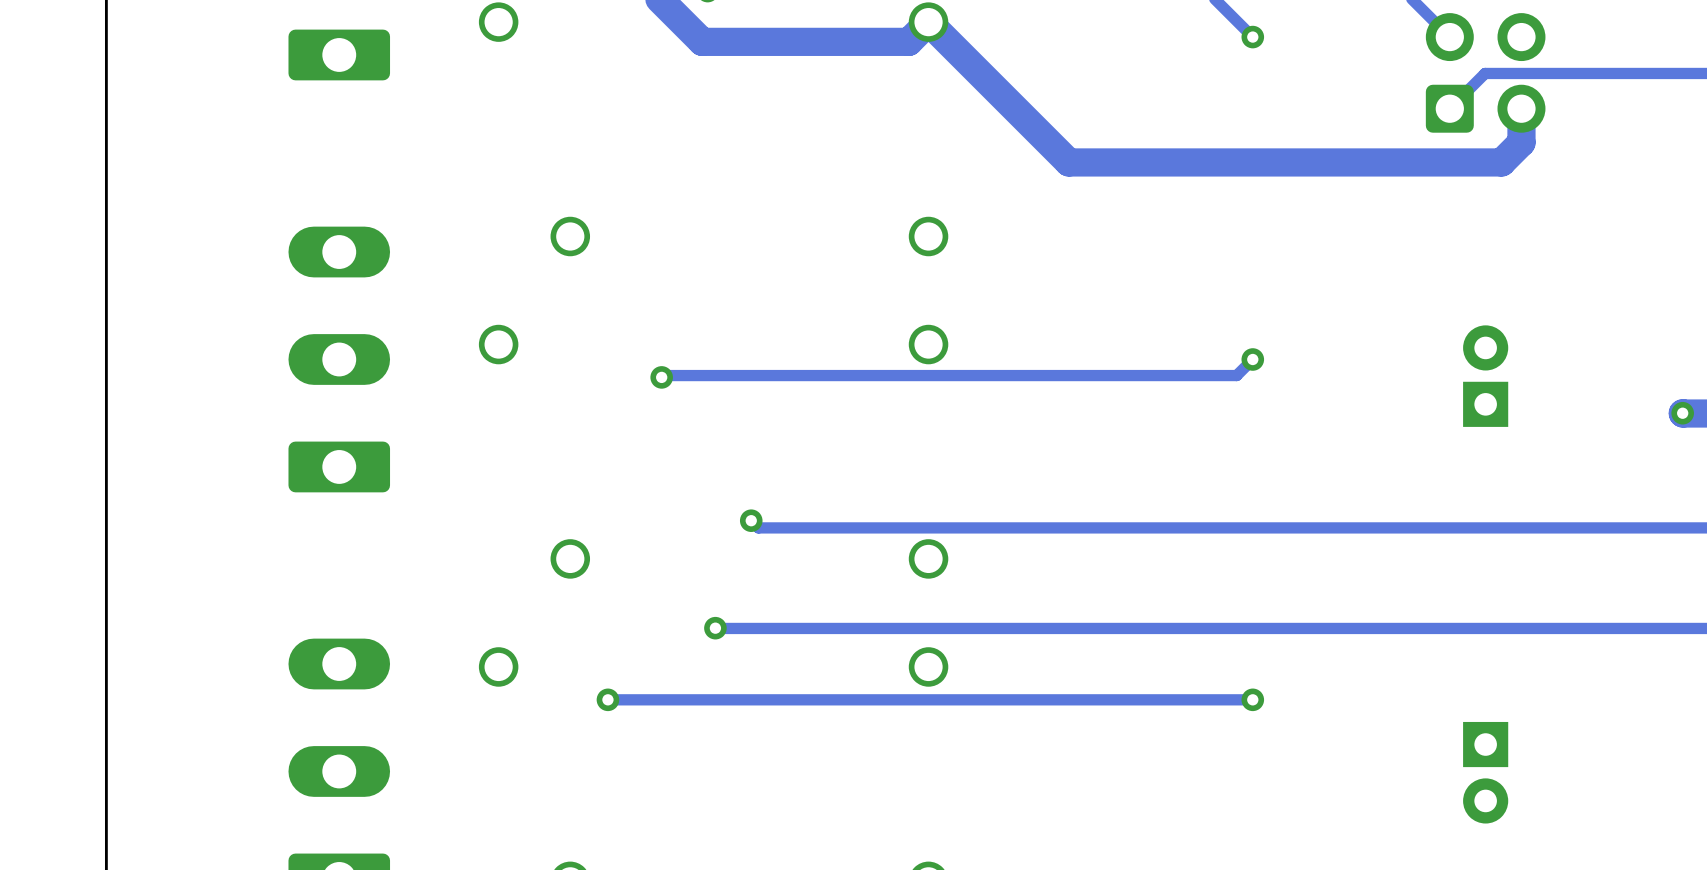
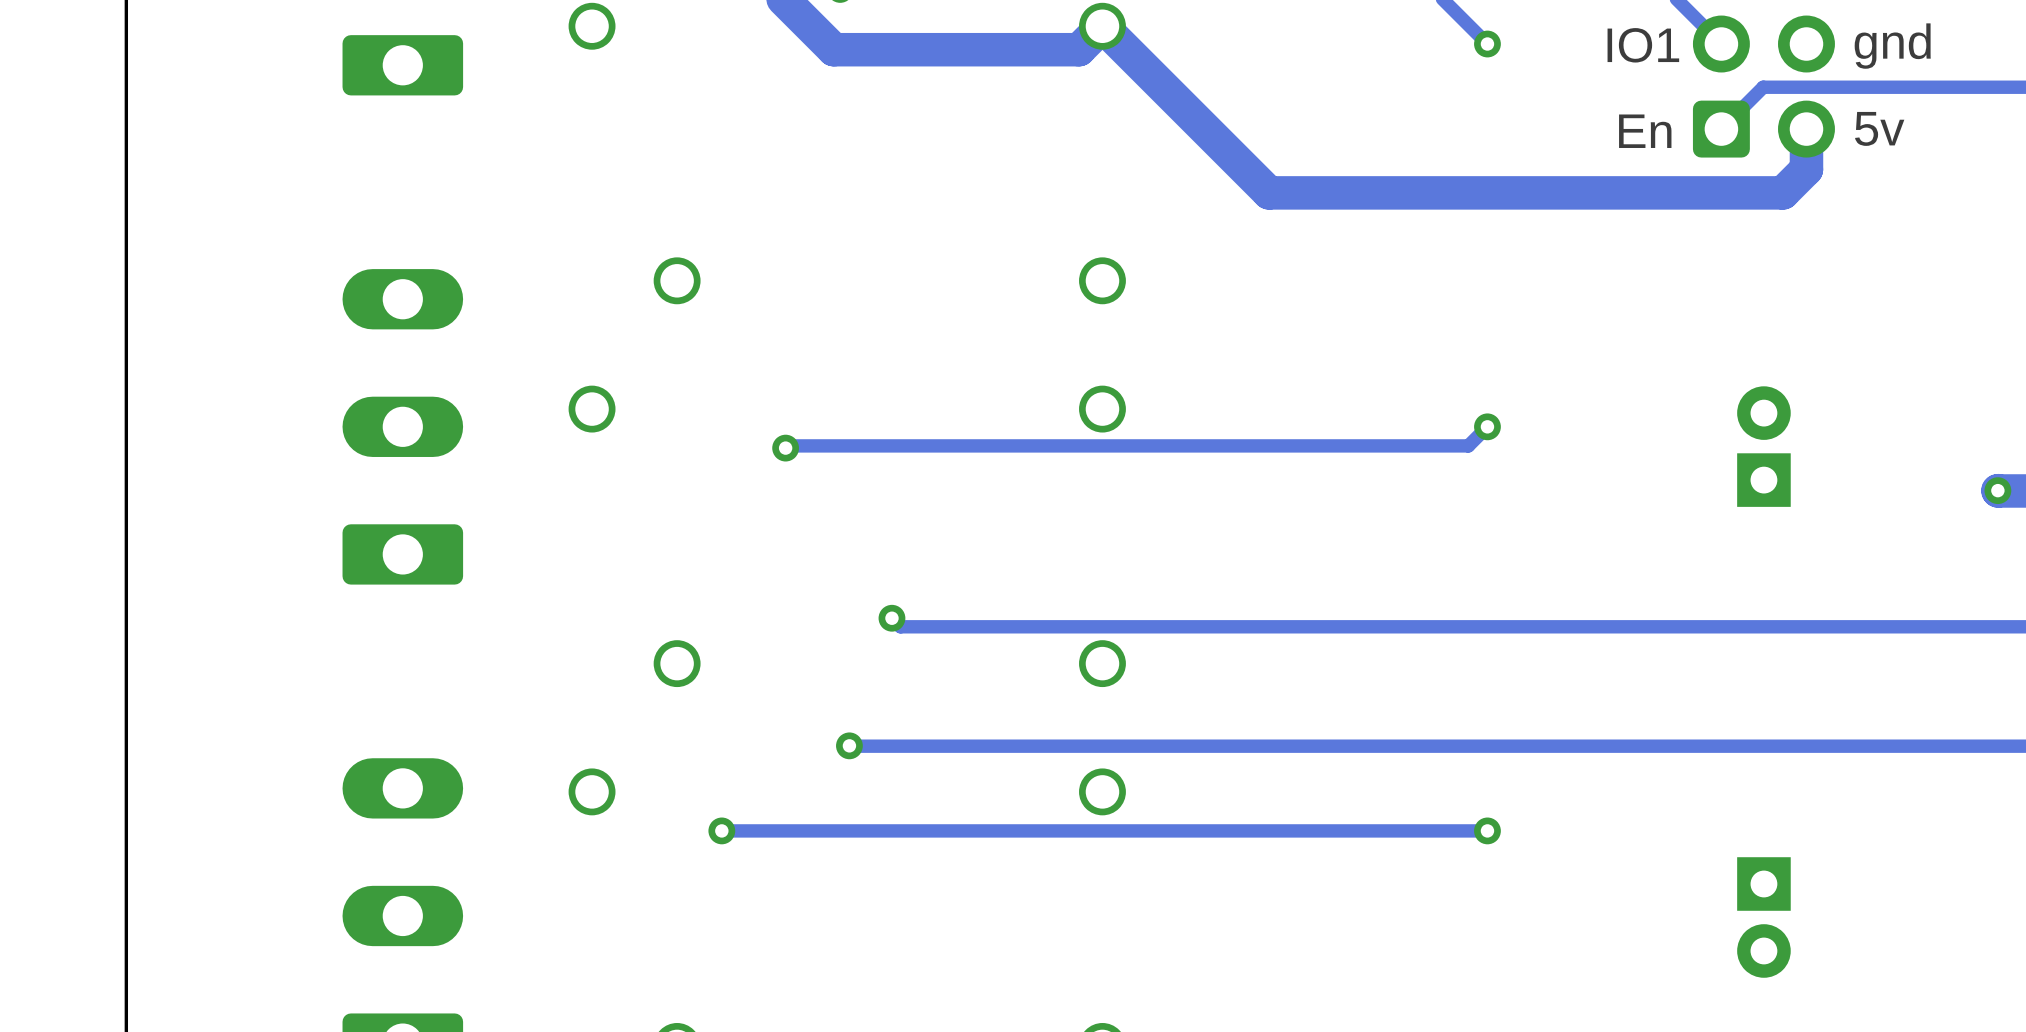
text: none -> IO1 (1643, 45)
text: none -> gnd (1892, 46)
text: none -> 5v (1879, 128)
text: none -> En (1645, 131)

